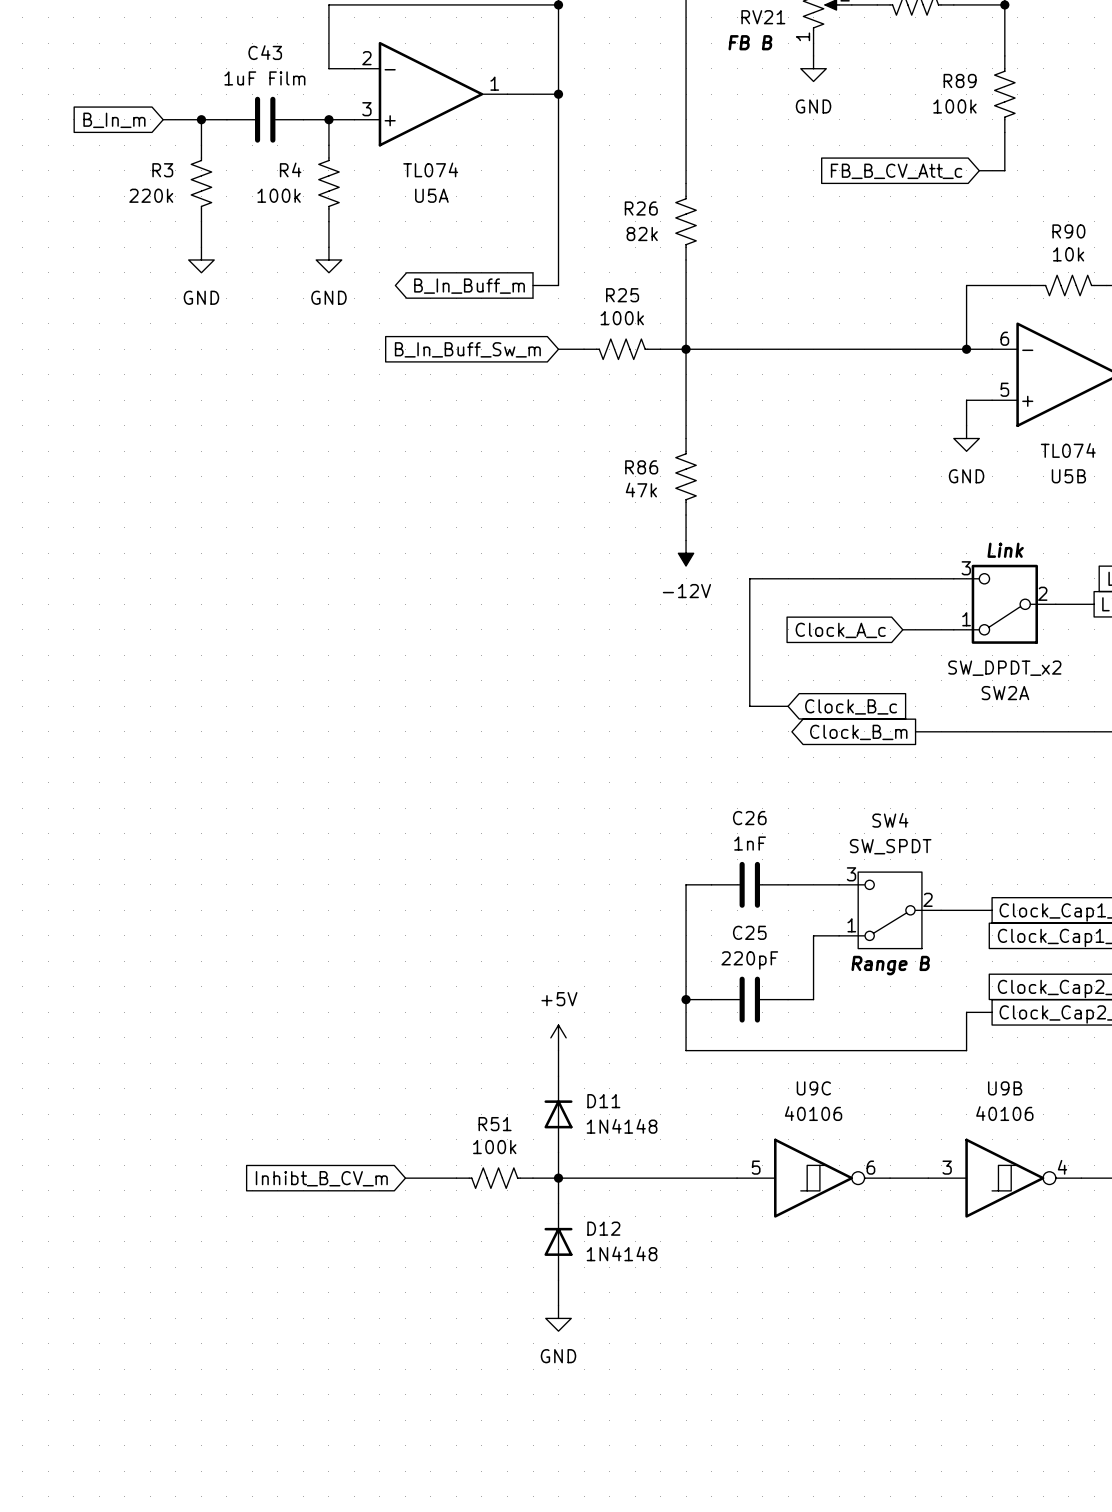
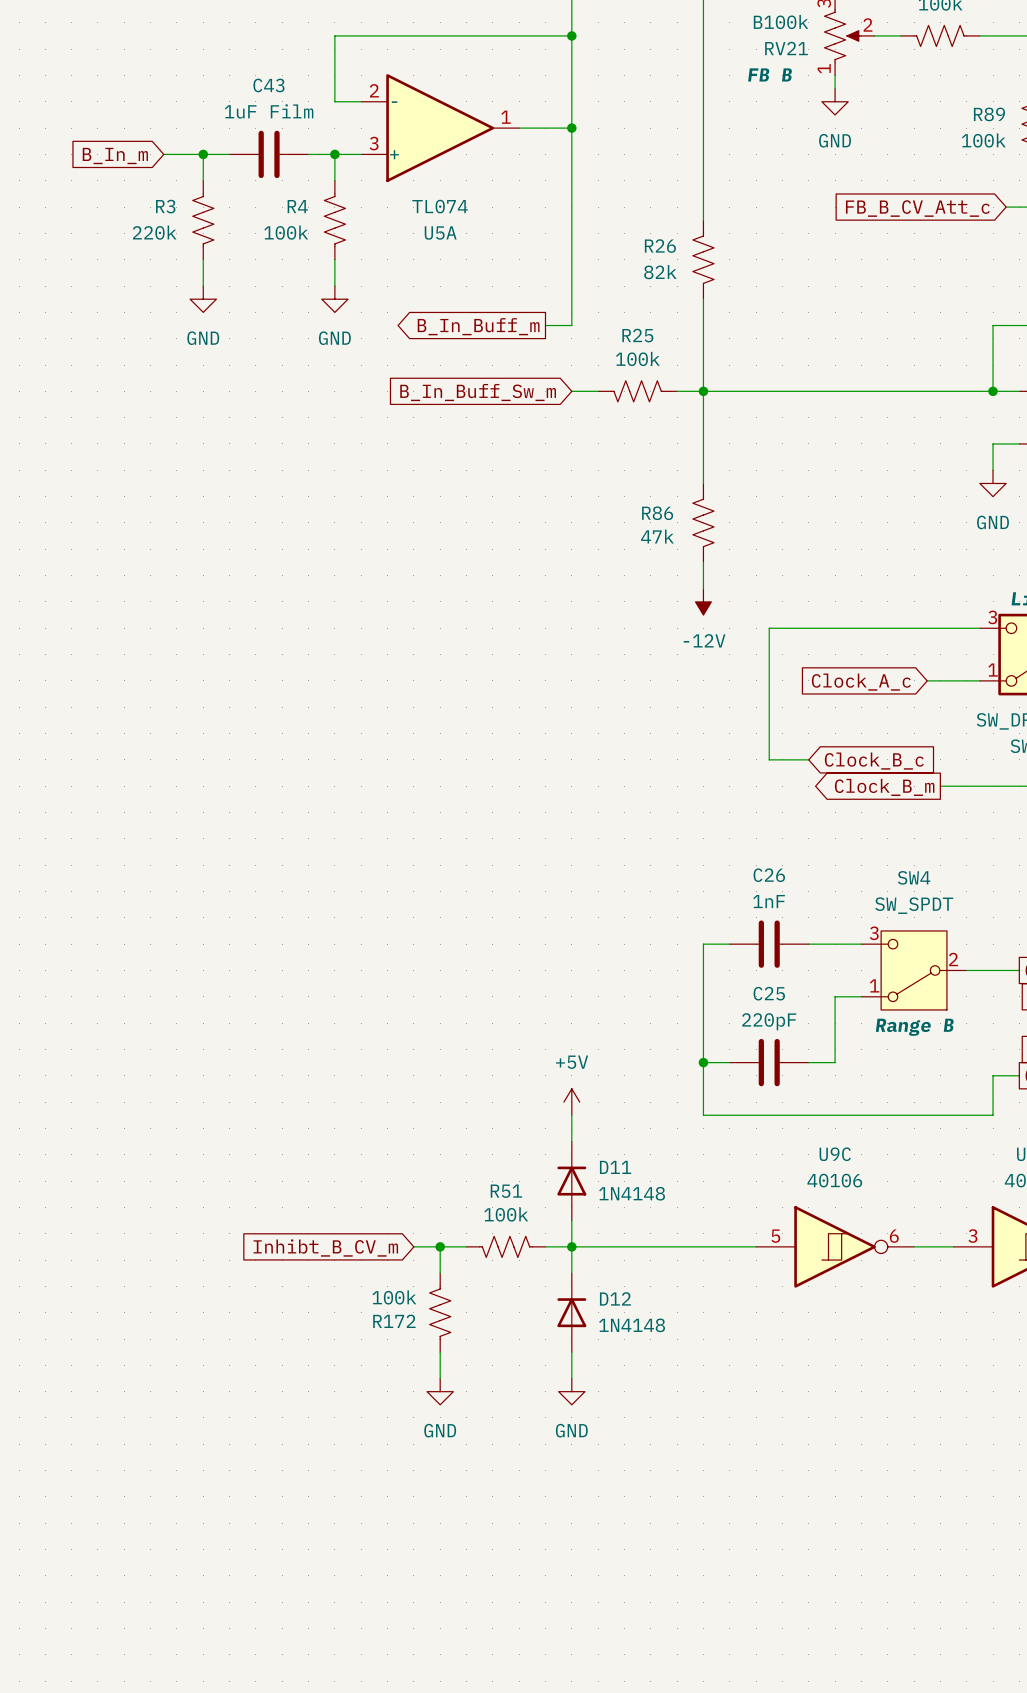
wire: none -> (440, 1246) (440, 1273)
junction: none -> (440, 1246)
R172: none -> 100k (440, 1312)
wire: none -> (440, 1352) (440, 1378)
power symbol: none -> GND (440, 1391)

